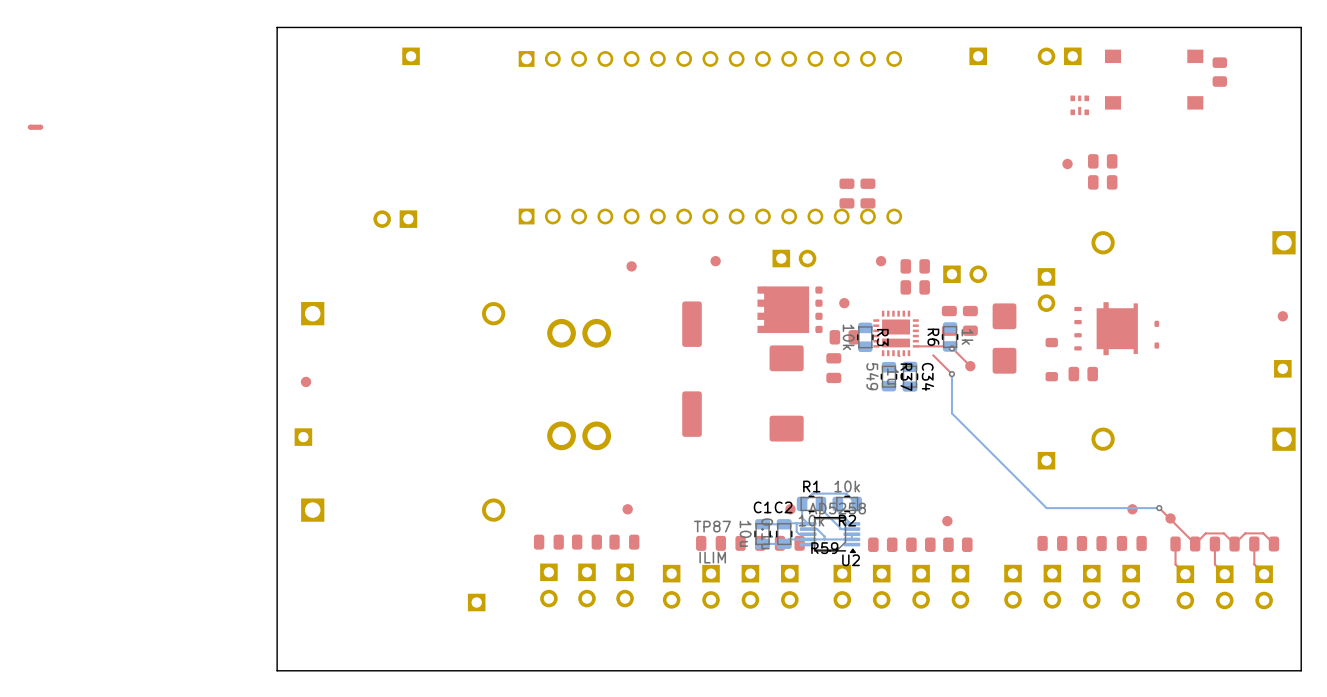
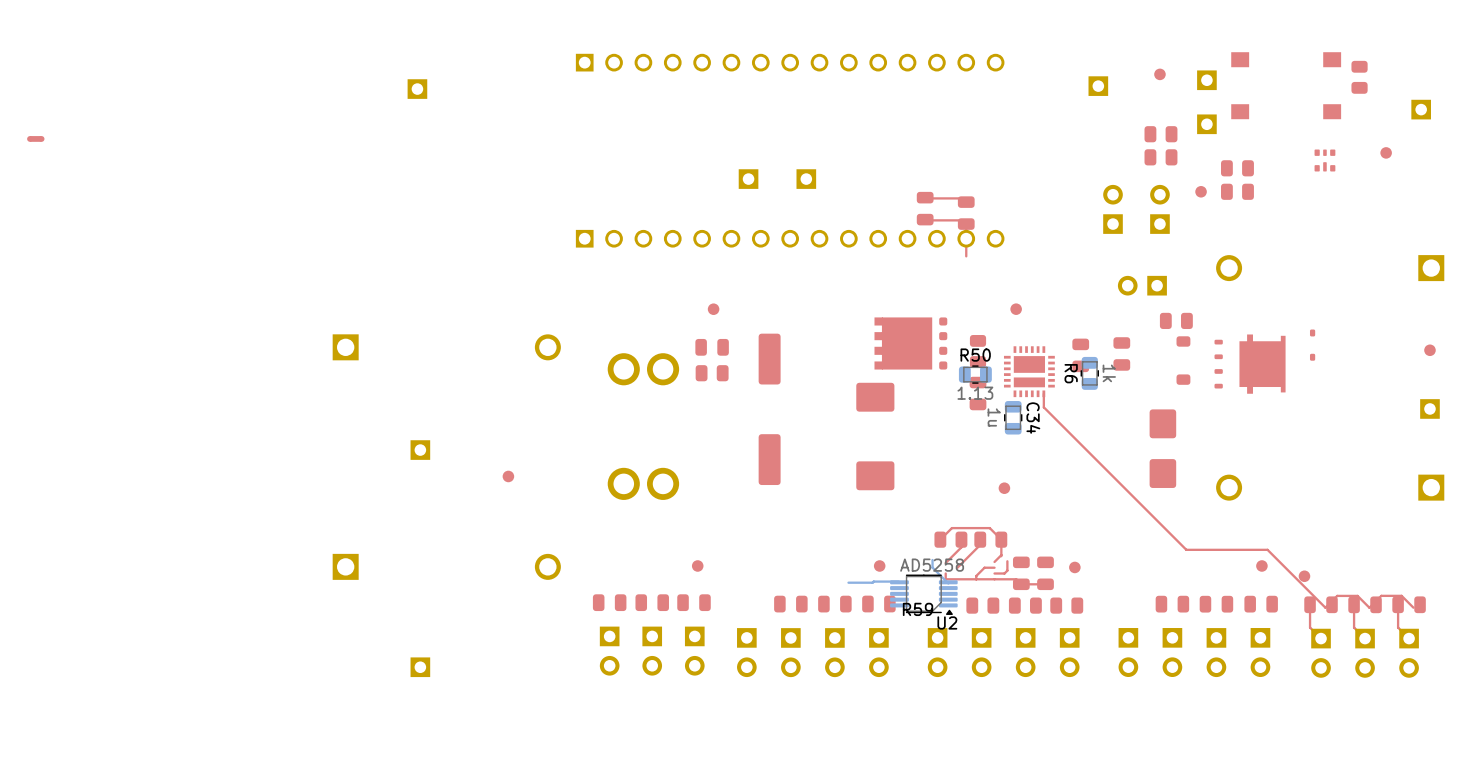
board edge: (1301, 27) (277, 27) (277, 670) (1301, 670) (1301, 27) -> none
part position: (411, 56) -> (417, 89)
part position: (978, 56) -> (1098, 86)
part: (1059, 56) -> none
part: none -> (1159, 74)
part: none -> (1206, 80)
part footprint: [1070, 95, 1090, 116] -> [1197, 114, 1217, 135]
part: none -> (1421, 109)
part: none -> (1160, 134)
part: none -> (1386, 152)
part: none -> (1160, 157)
part: none -> (1324, 160)
part: none -> (1237, 168)
part: (1102, 161) -> none
part: none -> (748, 179)
part: none -> (806, 179)
part position: (1067, 164) -> (1201, 191)
part: none -> (1237, 191)
top track: none -> (925, 197) (966, 198)
part: (1102, 182) -> none
part: none -> (1113, 209)
part: none -> (1159, 209)
part position: (846, 193) -> (925, 208)
top track: none -> (925, 219) (966, 220) (966, 256)
part: (395, 219) -> none
part: (794, 258) -> none
part: none -> (1142, 285)
part: (715, 261) -> none
part: (881, 261) -> none
part position: (631, 266) -> (713, 309)
part: (915, 266) -> none
part footprint: [1037, 268, 1056, 312] -> [1159, 312, 1193, 330]
part: (965, 274) -> none
part: none -> (1016, 309)
part: (915, 287) -> none
part: (844, 303) -> none
part position: (790, 309) -> (910, 343)
part: none -> (712, 347)
part: none -> (1121, 353)
part: (949, 320) -> none
part position: (1106, 328) -> (1250, 364)
part position: (896, 333) -> (1029, 371)
part position: (1156, 334) -> (1312, 345)
R6 position: (950, 336) -> (1089, 373)
R50 side: top (844, 337) -> bottom (975, 374)
R3 side: bottom (865, 337) -> top (978, 351)
part position: (1004, 338) -> (1162, 448)
top track: (917, 346) (949, 346) (970, 366) -> none
via: (951, 348) -> none
part: none -> (978, 393)
top track: (898, 355) (899, 356) -> none
top track: (933, 355) (951, 374) -> none
top track: none -> (1043, 393) (1043, 407) (1186, 549) (1267, 549) (1325, 607) (1337, 595) (1357, 595) (1369, 607) (1381, 595) (1401, 595) (1413, 607)
part position: (1051, 359) -> (1183, 360)
part: (970, 366) -> none
part: (833, 368) -> none
bottom track: (951, 374) (951, 413) (1046, 508) (1159, 508) -> none
via: (951, 374) -> none
part: (1083, 374) -> none
R37 side: bottom (888, 376) -> top (712, 373)
part: (306, 381) -> none
part: none -> (508, 476)
part position: (303, 437) -> (420, 450)
part: none -> (1004, 488)
part: (1046, 460) -> none
top track: none -> (939, 539) (951, 528) (989, 528) (1001, 539) (1001, 556)
top track: none -> (961, 539) (961, 547) (945, 563)
top track: none -> (980, 539) (980, 544) (957, 567)
top track: none -> (1001, 555) (994, 561)
R1 side: bottom (811, 503) -> top (990, 539)
bottom track: (820, 503) (820, 508) (841, 529) -> none
R2 side: bottom (847, 503) -> top (950, 539)
bottom track: (857, 503) (846, 493) (812, 493) (802, 503) (802, 518) -> none
top track: none -> (1007, 561) (1007, 570) (1004, 573) (994, 573)
top track: (1159, 508) (1195, 543) (1205, 533) (1223, 533) (1234, 544) (1245, 533) (1263, 533) (1273, 543) -> none
via: (1159, 508) -> none
top track: none -> (994, 567) (984, 567) (976, 576) (976, 579)
part: none -> (1074, 567)
top track: none -> (945, 573) (945, 579) (1016, 579) (1021, 584) (1045, 584)
bottom track: (801, 517) (808, 523) -> none
TP87: ILIM (947, 521) -> none
bottom track: (796, 523) (796, 531) (799, 534) (808, 534) -> none
bottom track: (808, 529) (817, 529) (824, 536) (824, 539) -> none
C1 side: bottom (762, 534) -> top (1045, 573)
C2 side: bottom (784, 534) -> top (1021, 573)
bottom track: (851, 534) (851, 539) (788, 539) (784, 543) (762, 543) -> none
part: none -> (420, 667)
part: (476, 602) -> none

